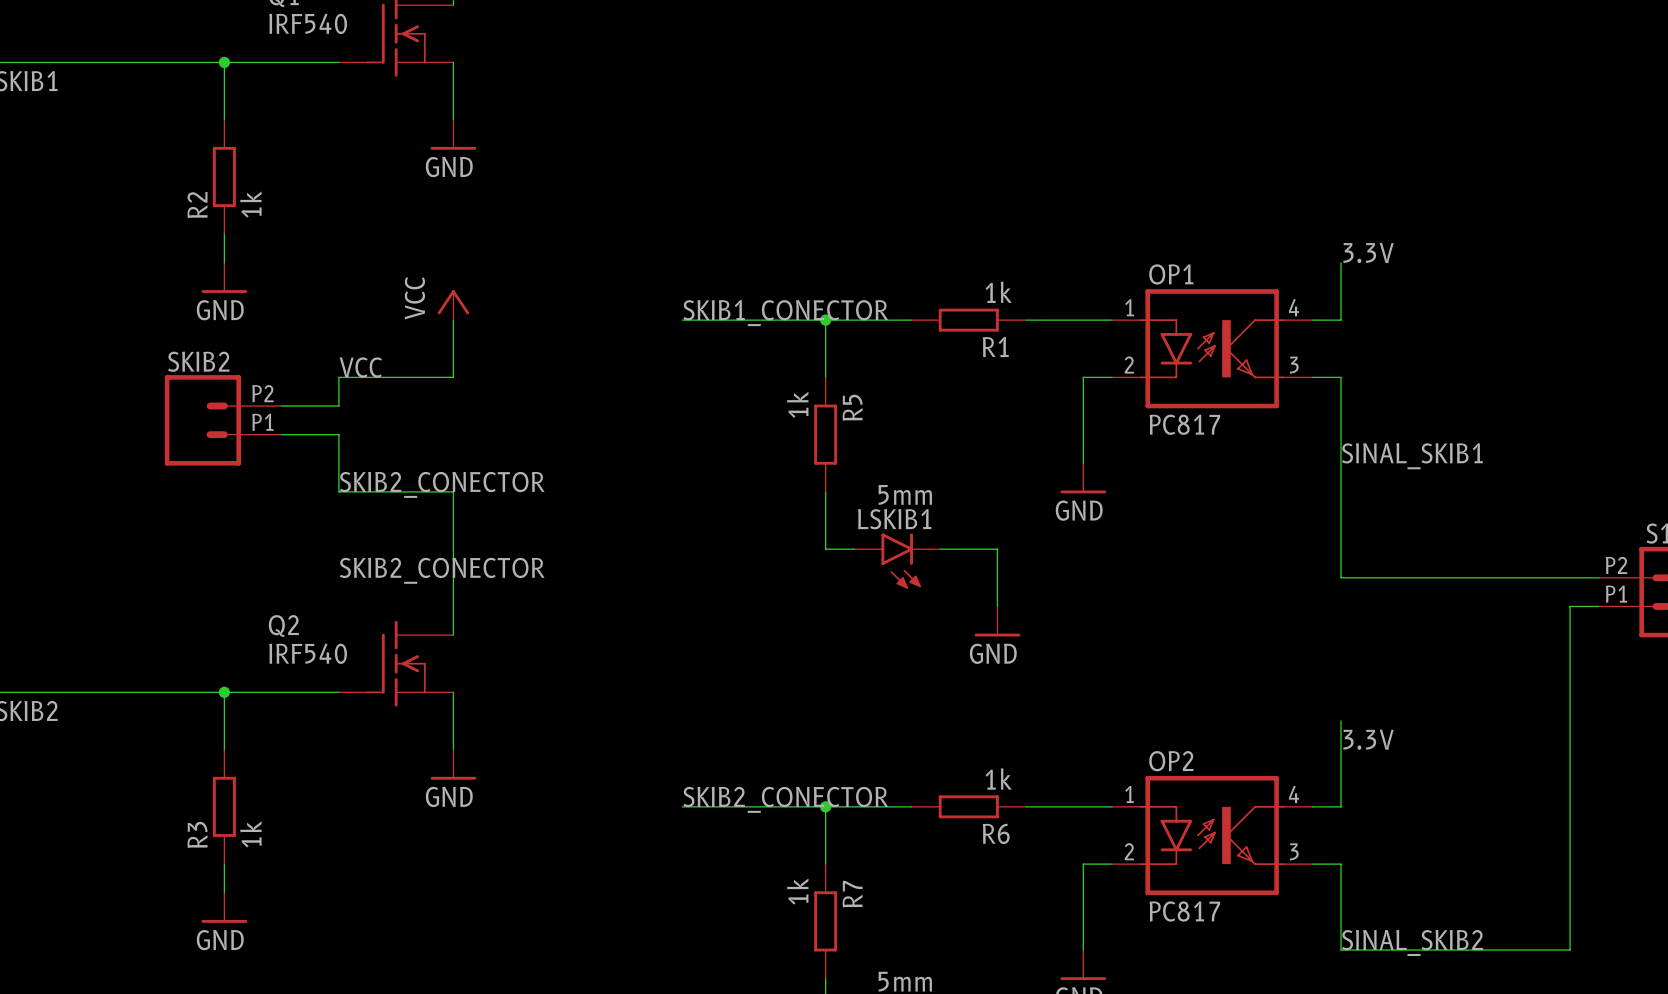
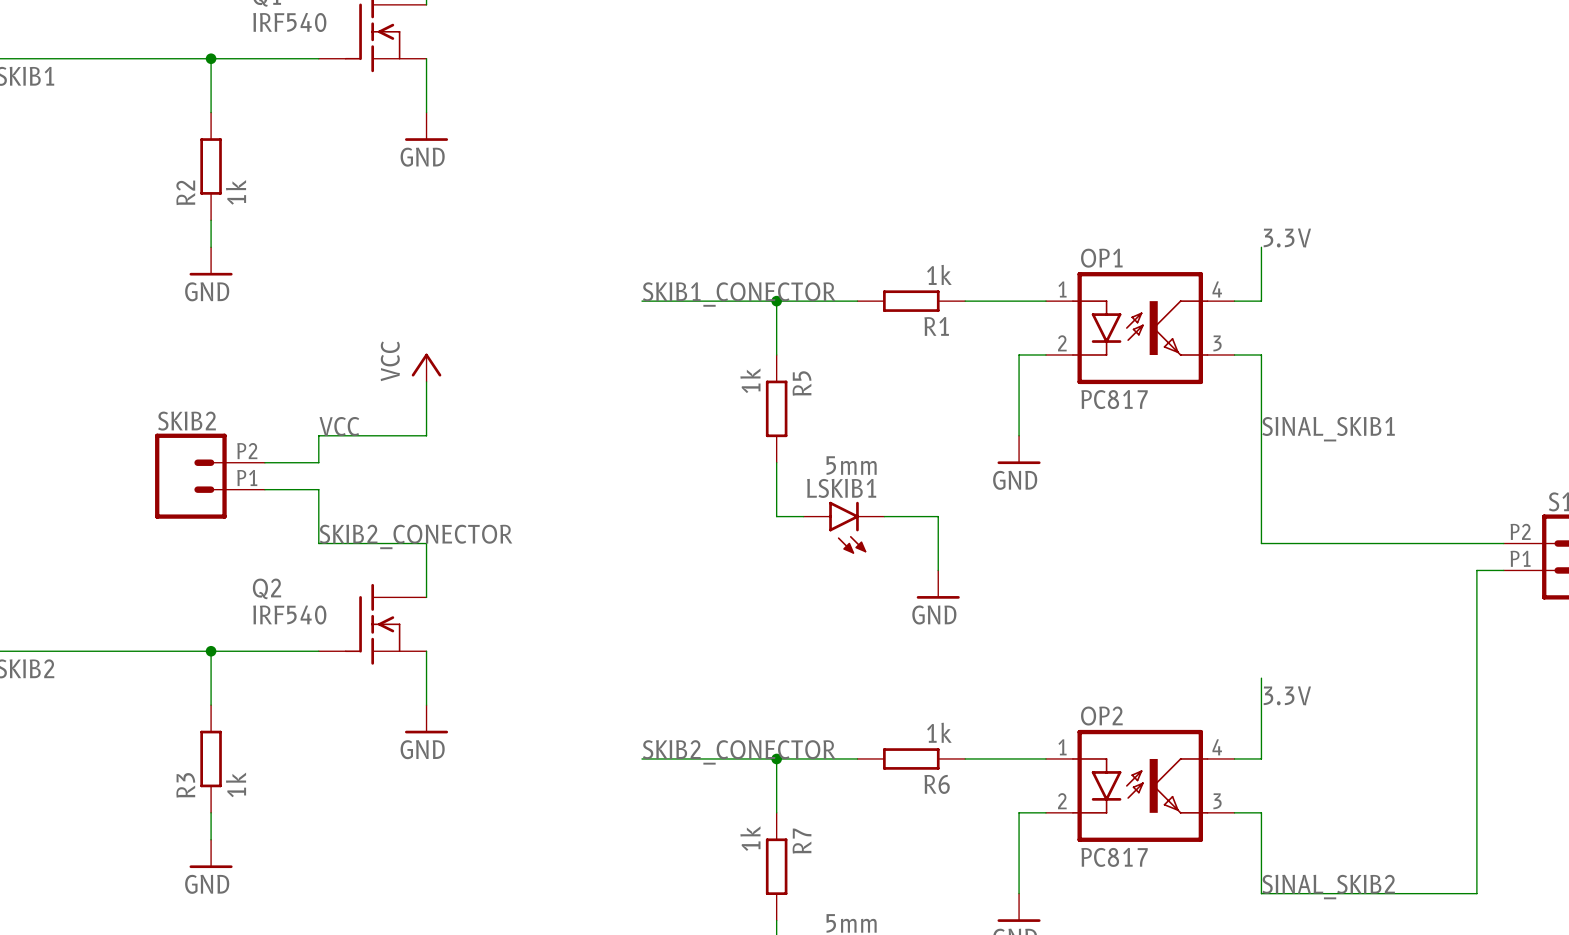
power symbol position: VCC (453, 305) -> VCC (426, 367)
wire: (453, 320) (453, 377) (338, 377) (338, 406) (281, 406) -> none
label position: VCC (360, 367) -> VCC (339, 426)
SKIB2 position: (223, 420) -> (209, 476)
wire: (281, 434) (338, 434) (338, 463) -> (426, 381) (426, 435) (318, 435)
label: SKIB2_CONECTOR (442, 484) -> none
wire: none -> (264, 462) (318, 462)
wire: (338, 491) (453, 491) (453, 577) -> (264, 489) (318, 489) (318, 543) (426, 543)

